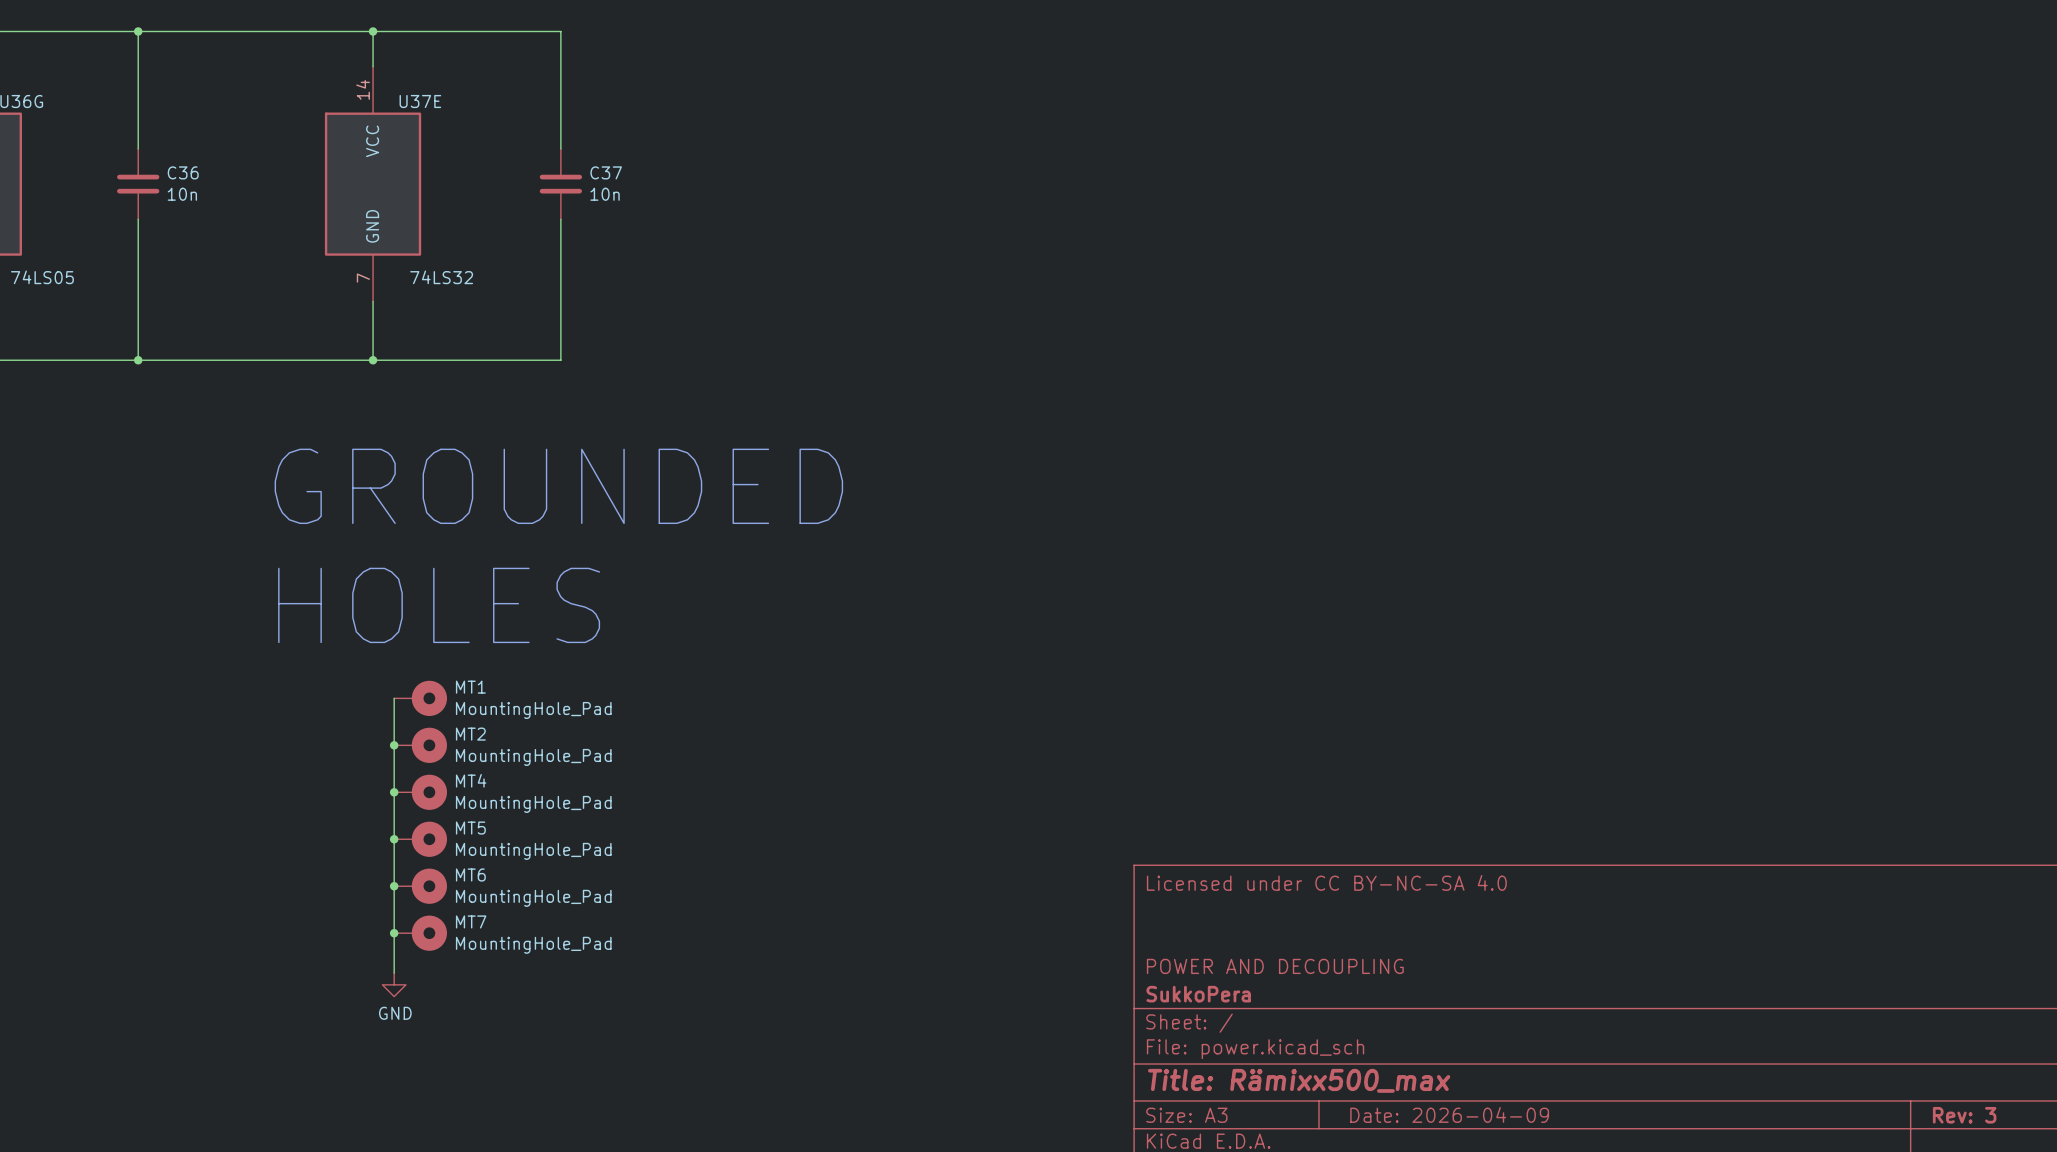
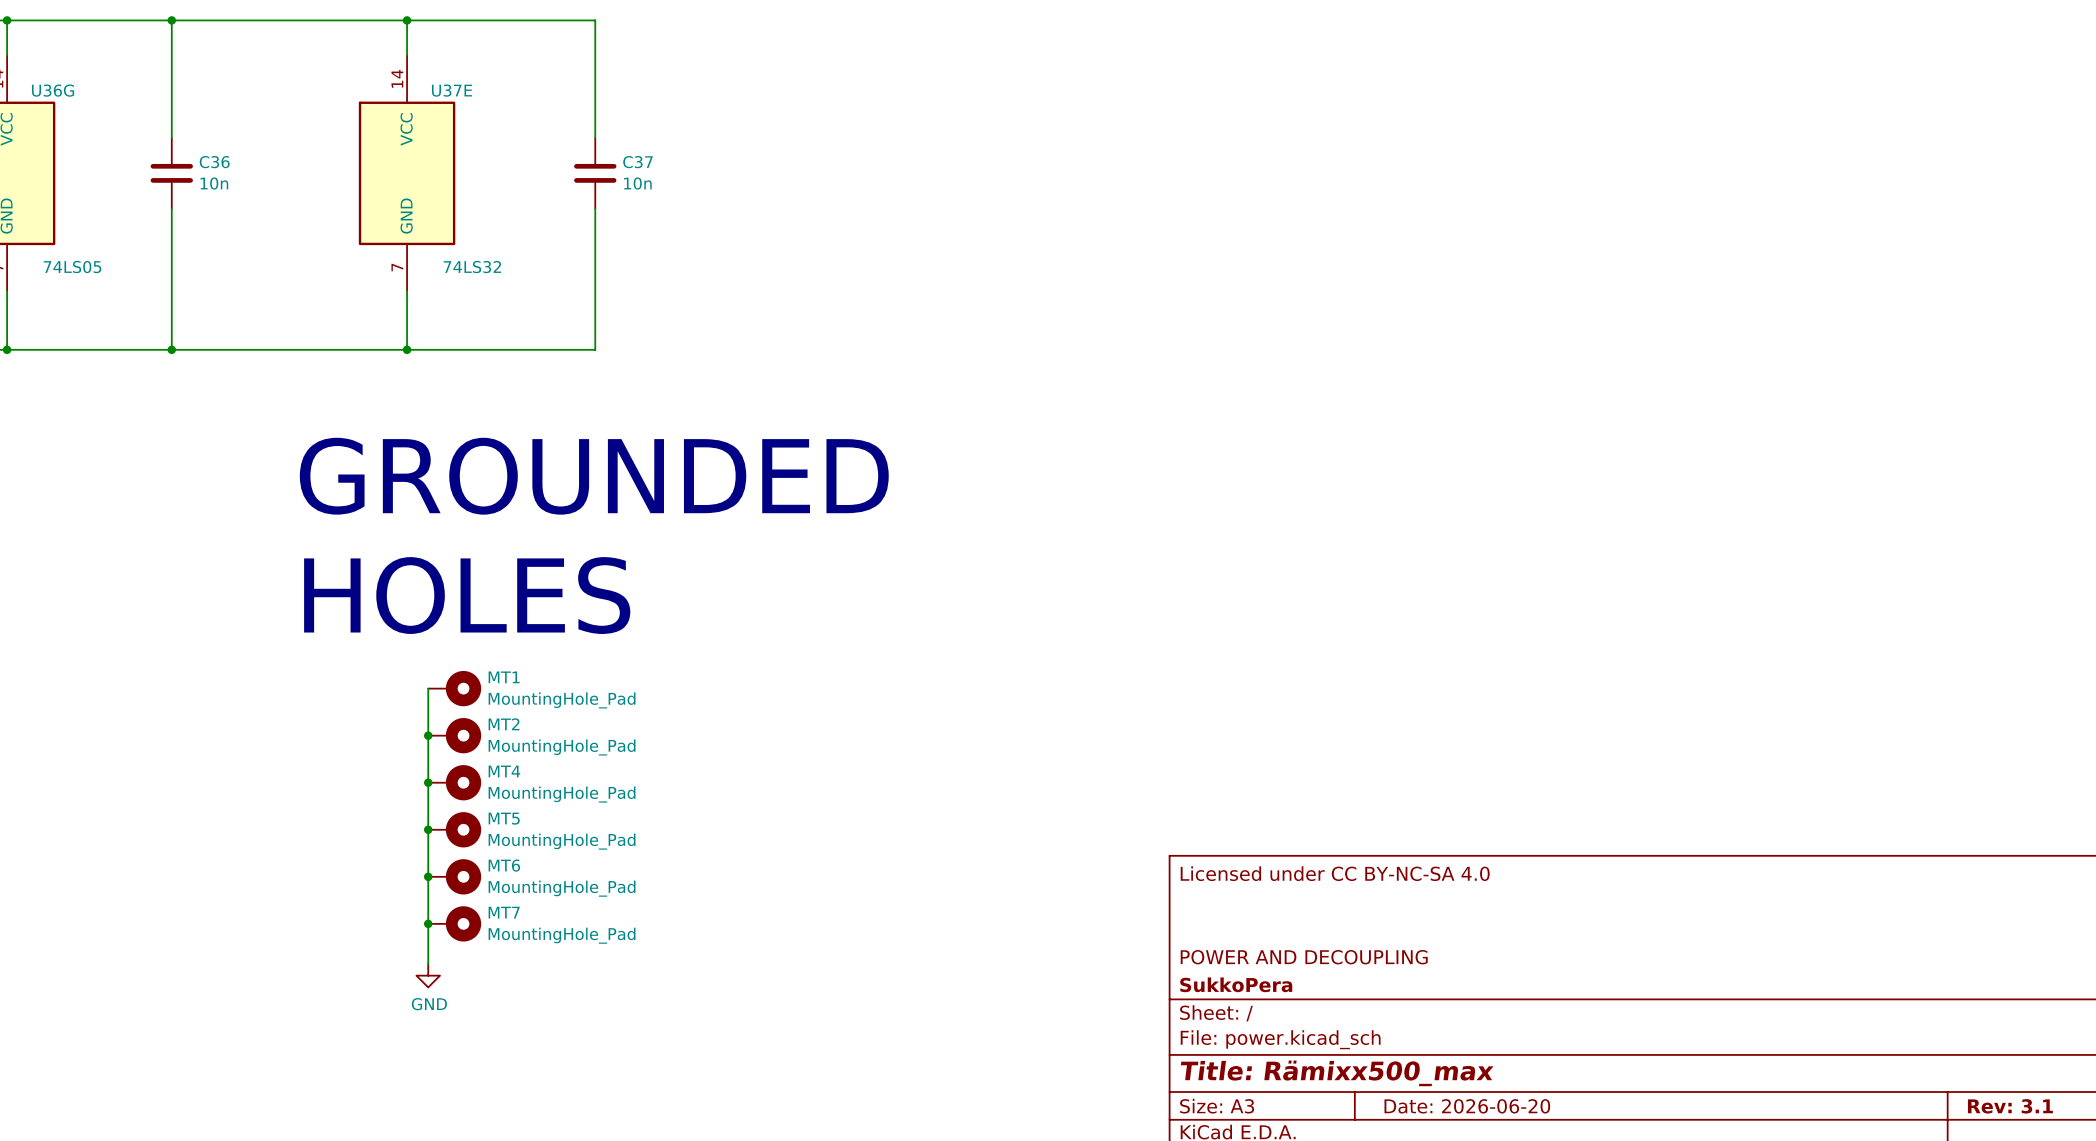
title block: Date: 2026-04-09 (1449, 1114) -> Date: 2026-06-20 (1467, 1106)
title block: Rev: 3 (1964, 1115) -> Rev: 3.1 (2010, 1106)

